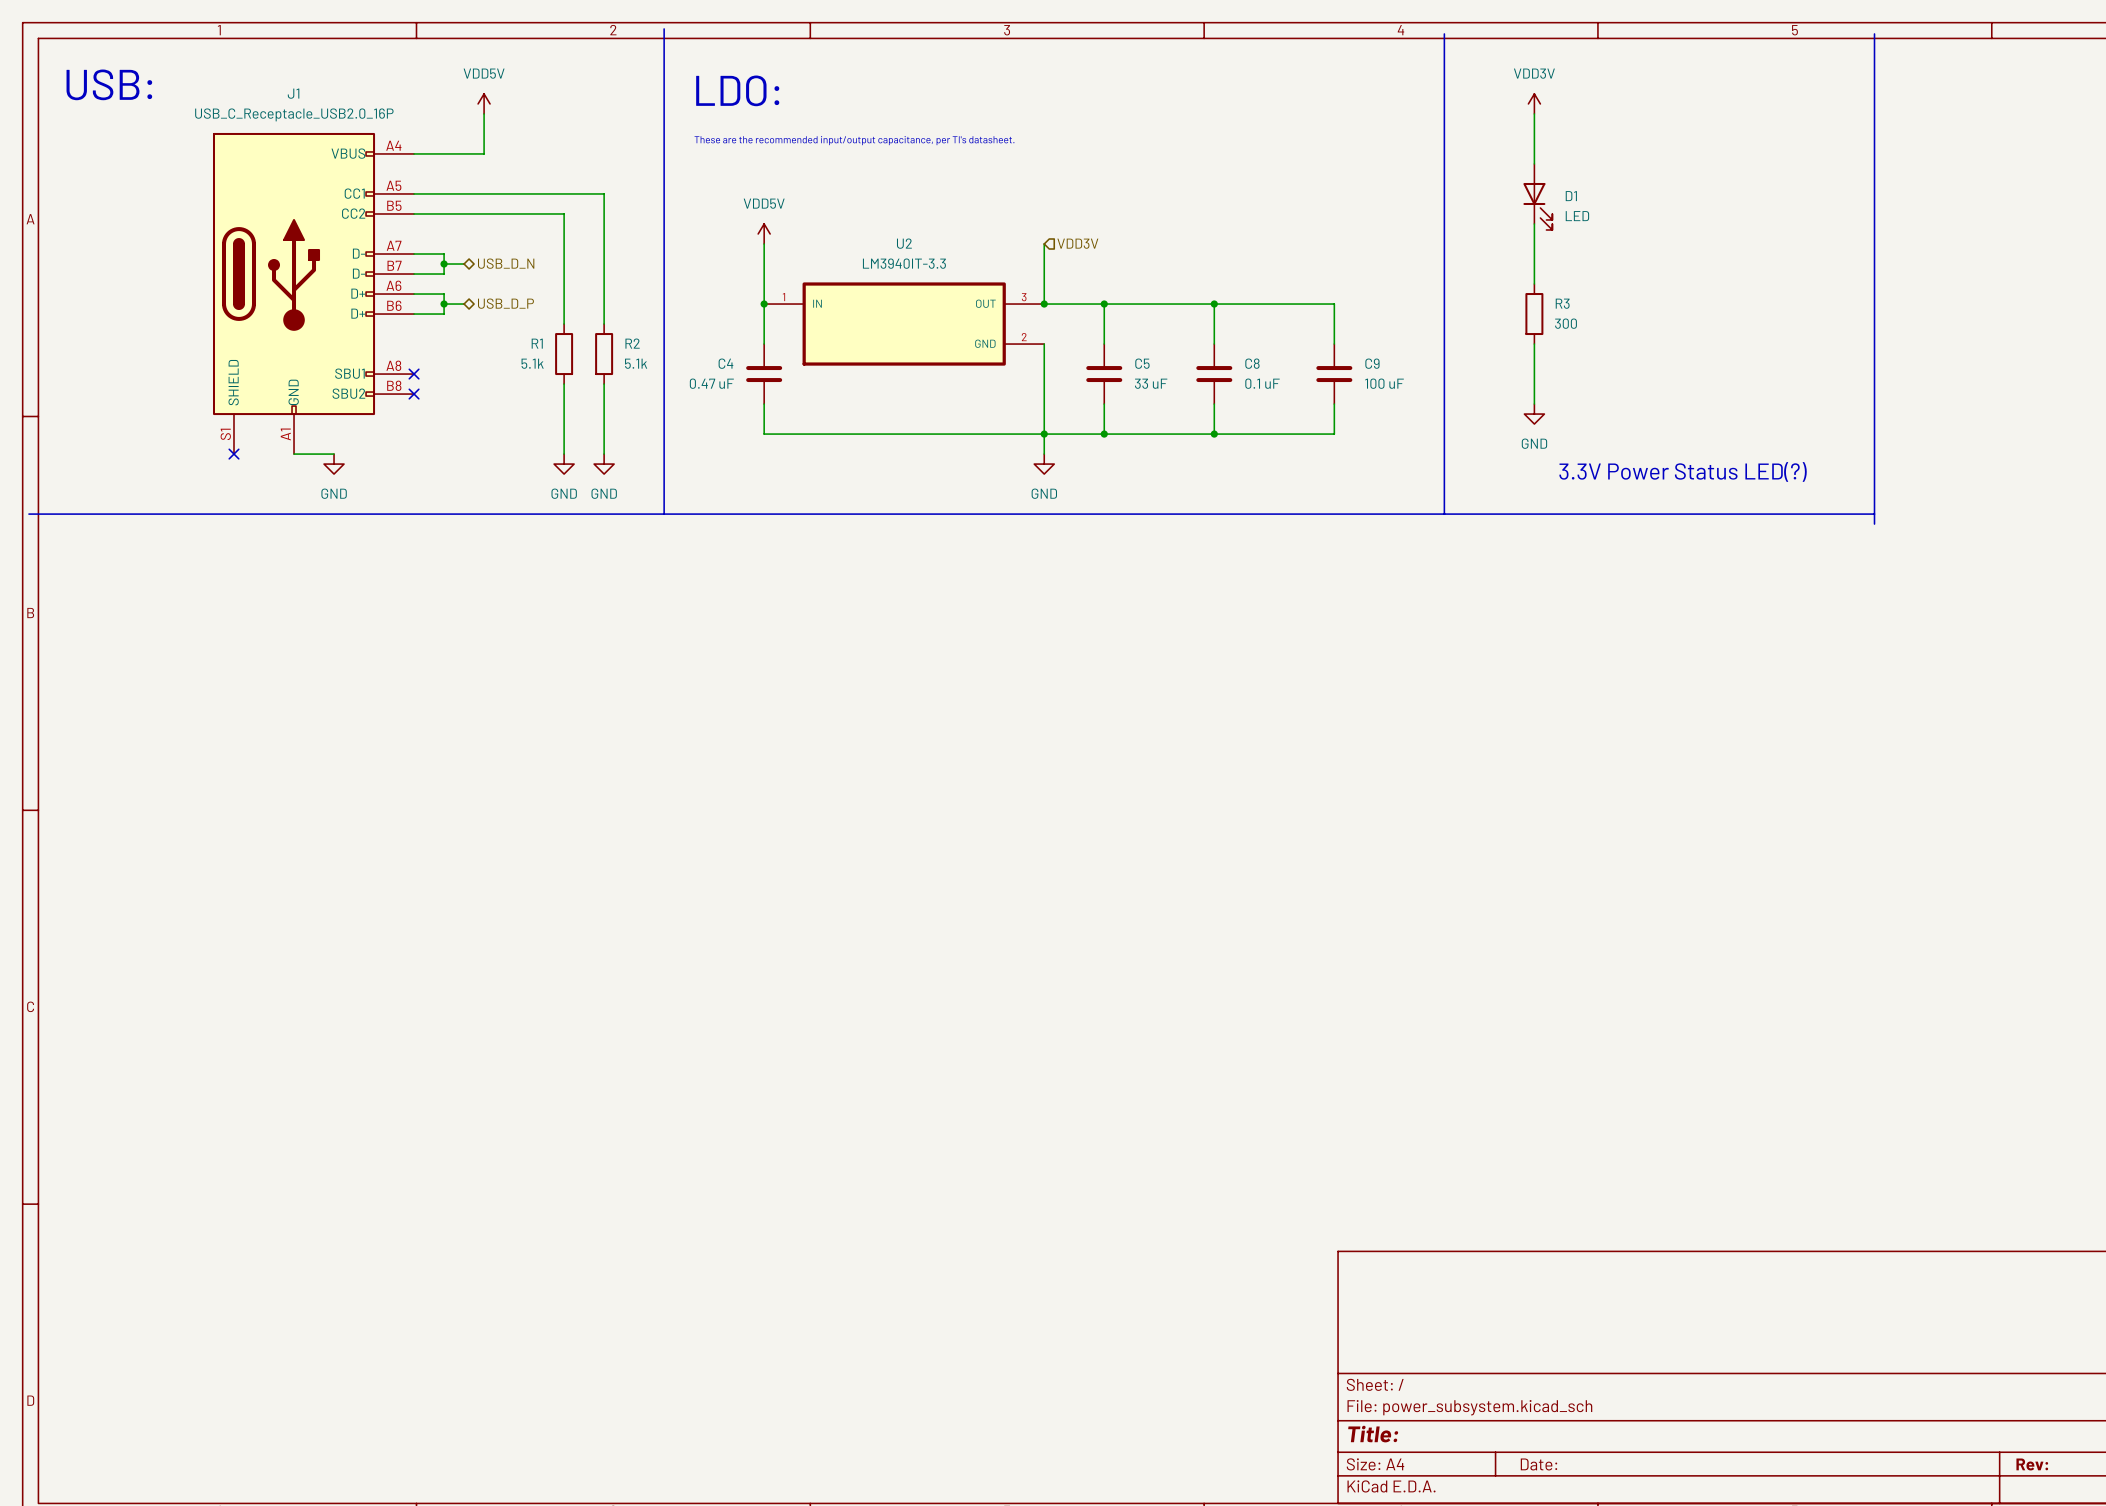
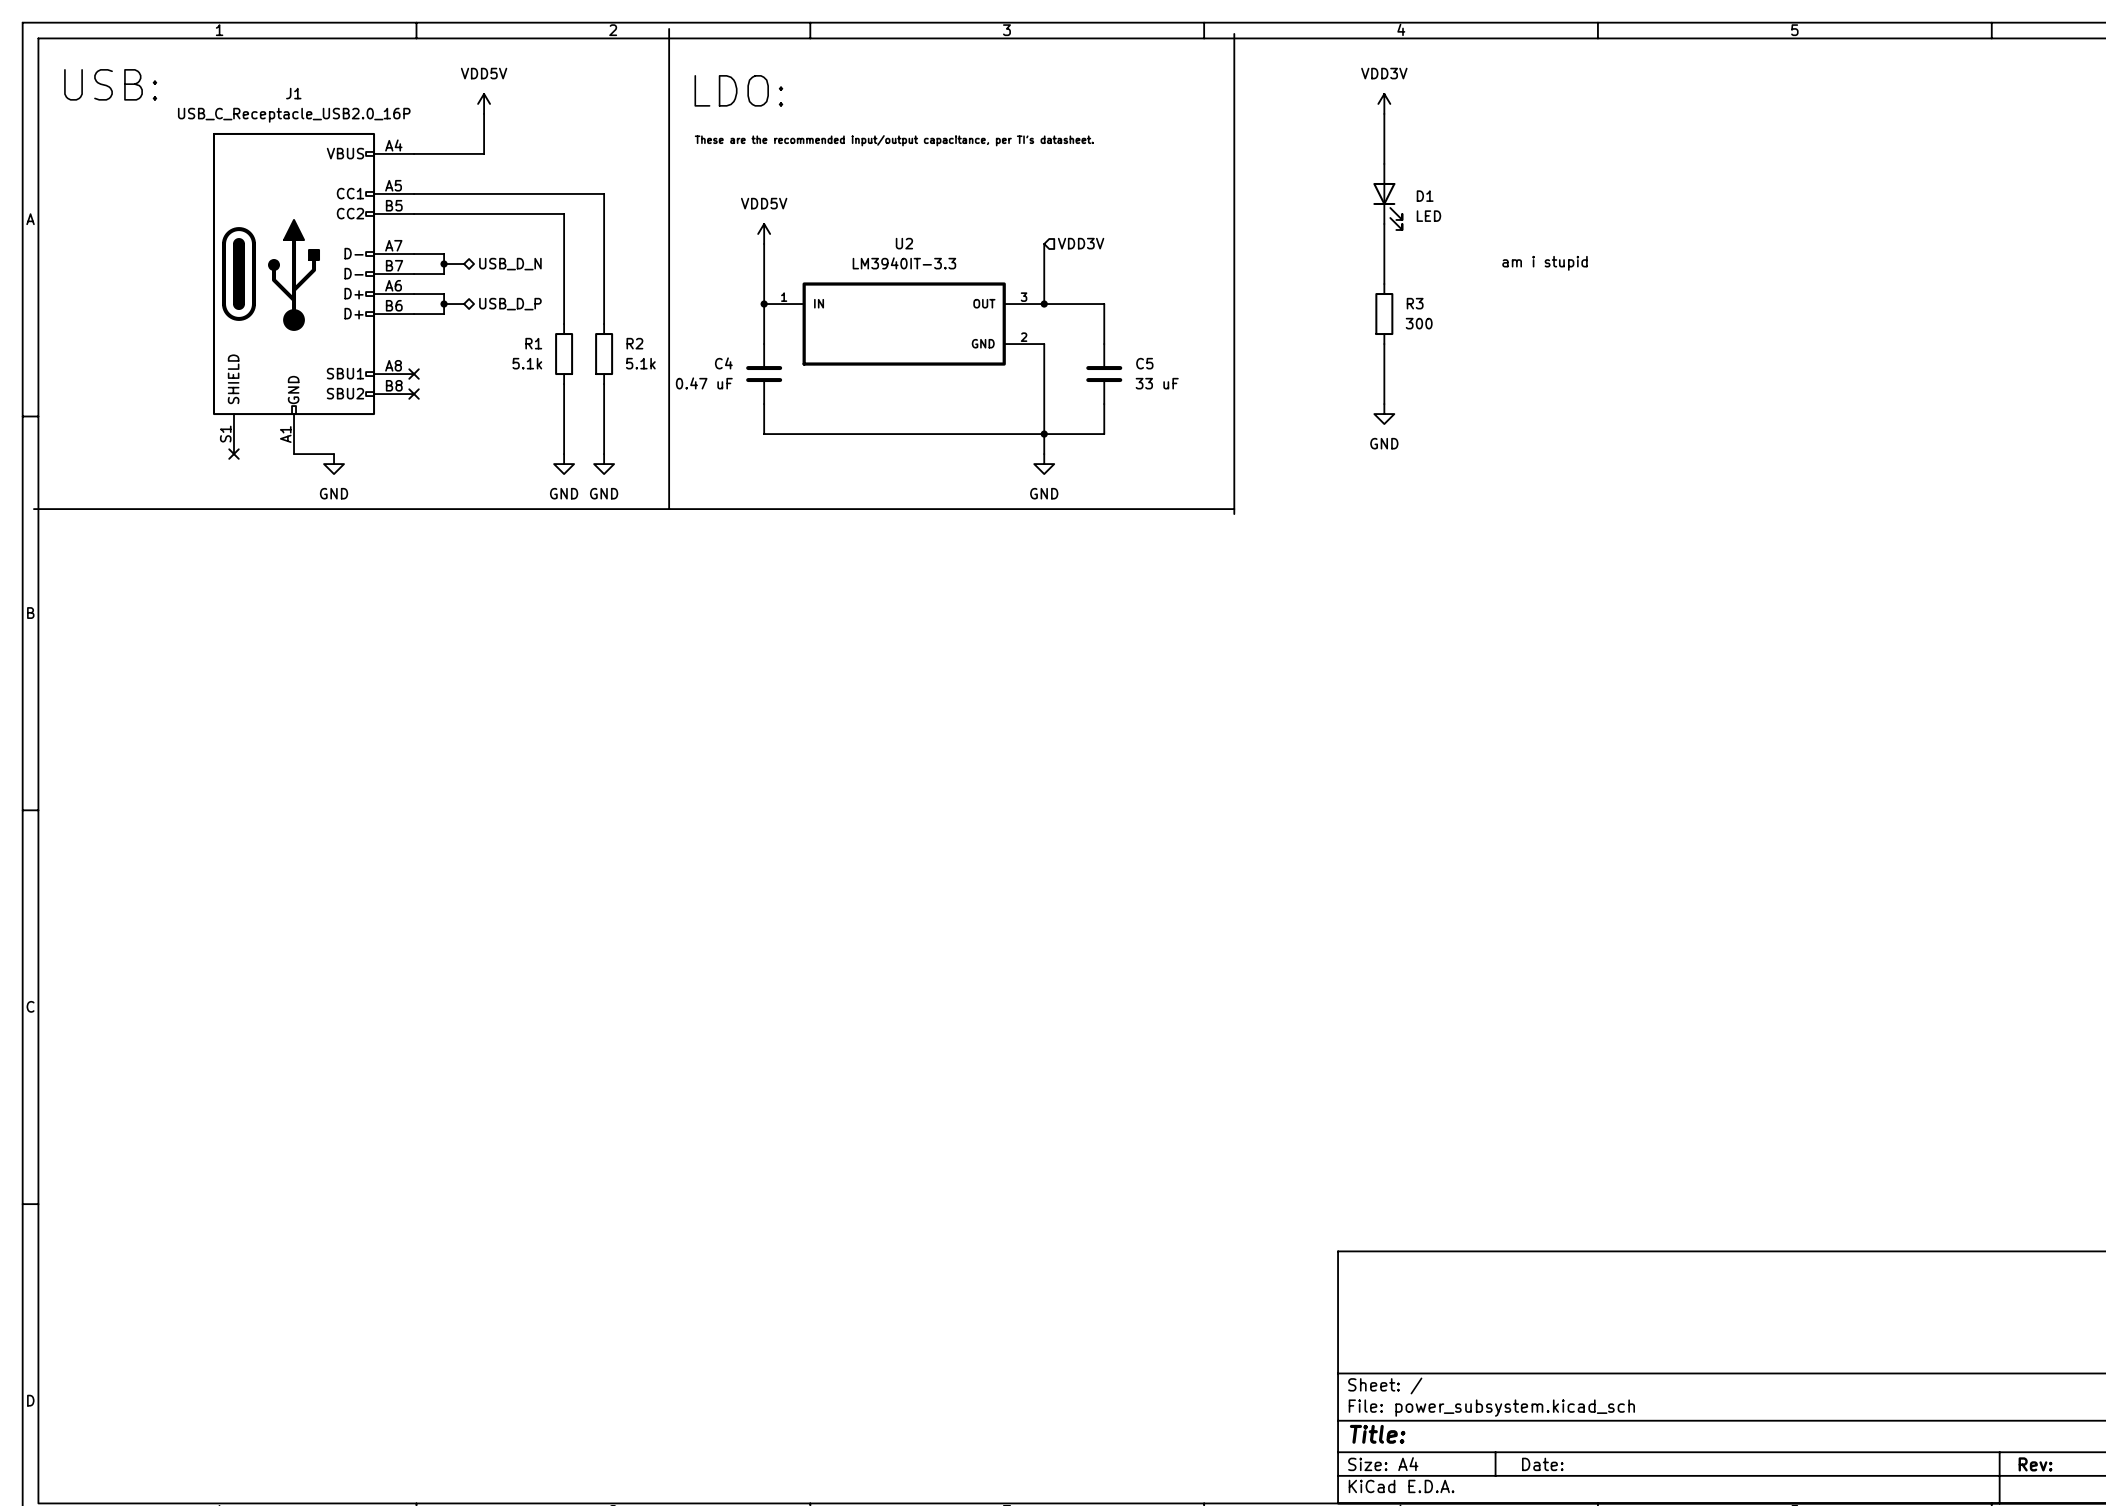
line: (664, 28) (664, 514) -> none
line: none -> (669, 28) (669, 509)
line: none -> (1234, 33) (1234, 514)
line: (1444, 33) (1444, 514) -> none
line: (1874, 33) (1874, 524) -> none
power symbol position: VDD3V (1534, 103) -> VDD3V (1384, 103)
wire: (1534, 113) (1534, 163) -> (1384, 113) (1384, 163)
D1 position: (1537, 196) -> (1387, 196)
wire: (1534, 223) (1534, 284) -> (1384, 223) (1384, 284)
text: none -> am i stupid (1544, 263)
wire: (1104, 304) (1334, 304) (1334, 344) -> none
junction: (1104, 304) -> none
wire: (1214, 304) (1214, 344) -> none
junction: (1214, 304) -> none
R3 position: (1534, 314) -> (1384, 314)
wire: (1534, 344) (1534, 404) -> (1384, 344) (1384, 404)
C8: 0.1 uF (1214, 374) -> none
C9: 100 uF (1334, 374) -> none
wire: (1214, 404) (1214, 434) -> none
wire: (1334, 404) (1334, 434) (1104, 434) -> none
power symbol position: GND (1534, 414) -> GND (1384, 414)
junction: (1104, 434) -> none
junction: (1214, 434) -> none
text: 3.3V Power Status LED(?) (1683, 471) -> none
line: none -> (33, 509) (1234, 509)
line: (28, 514) (1874, 514) -> none

